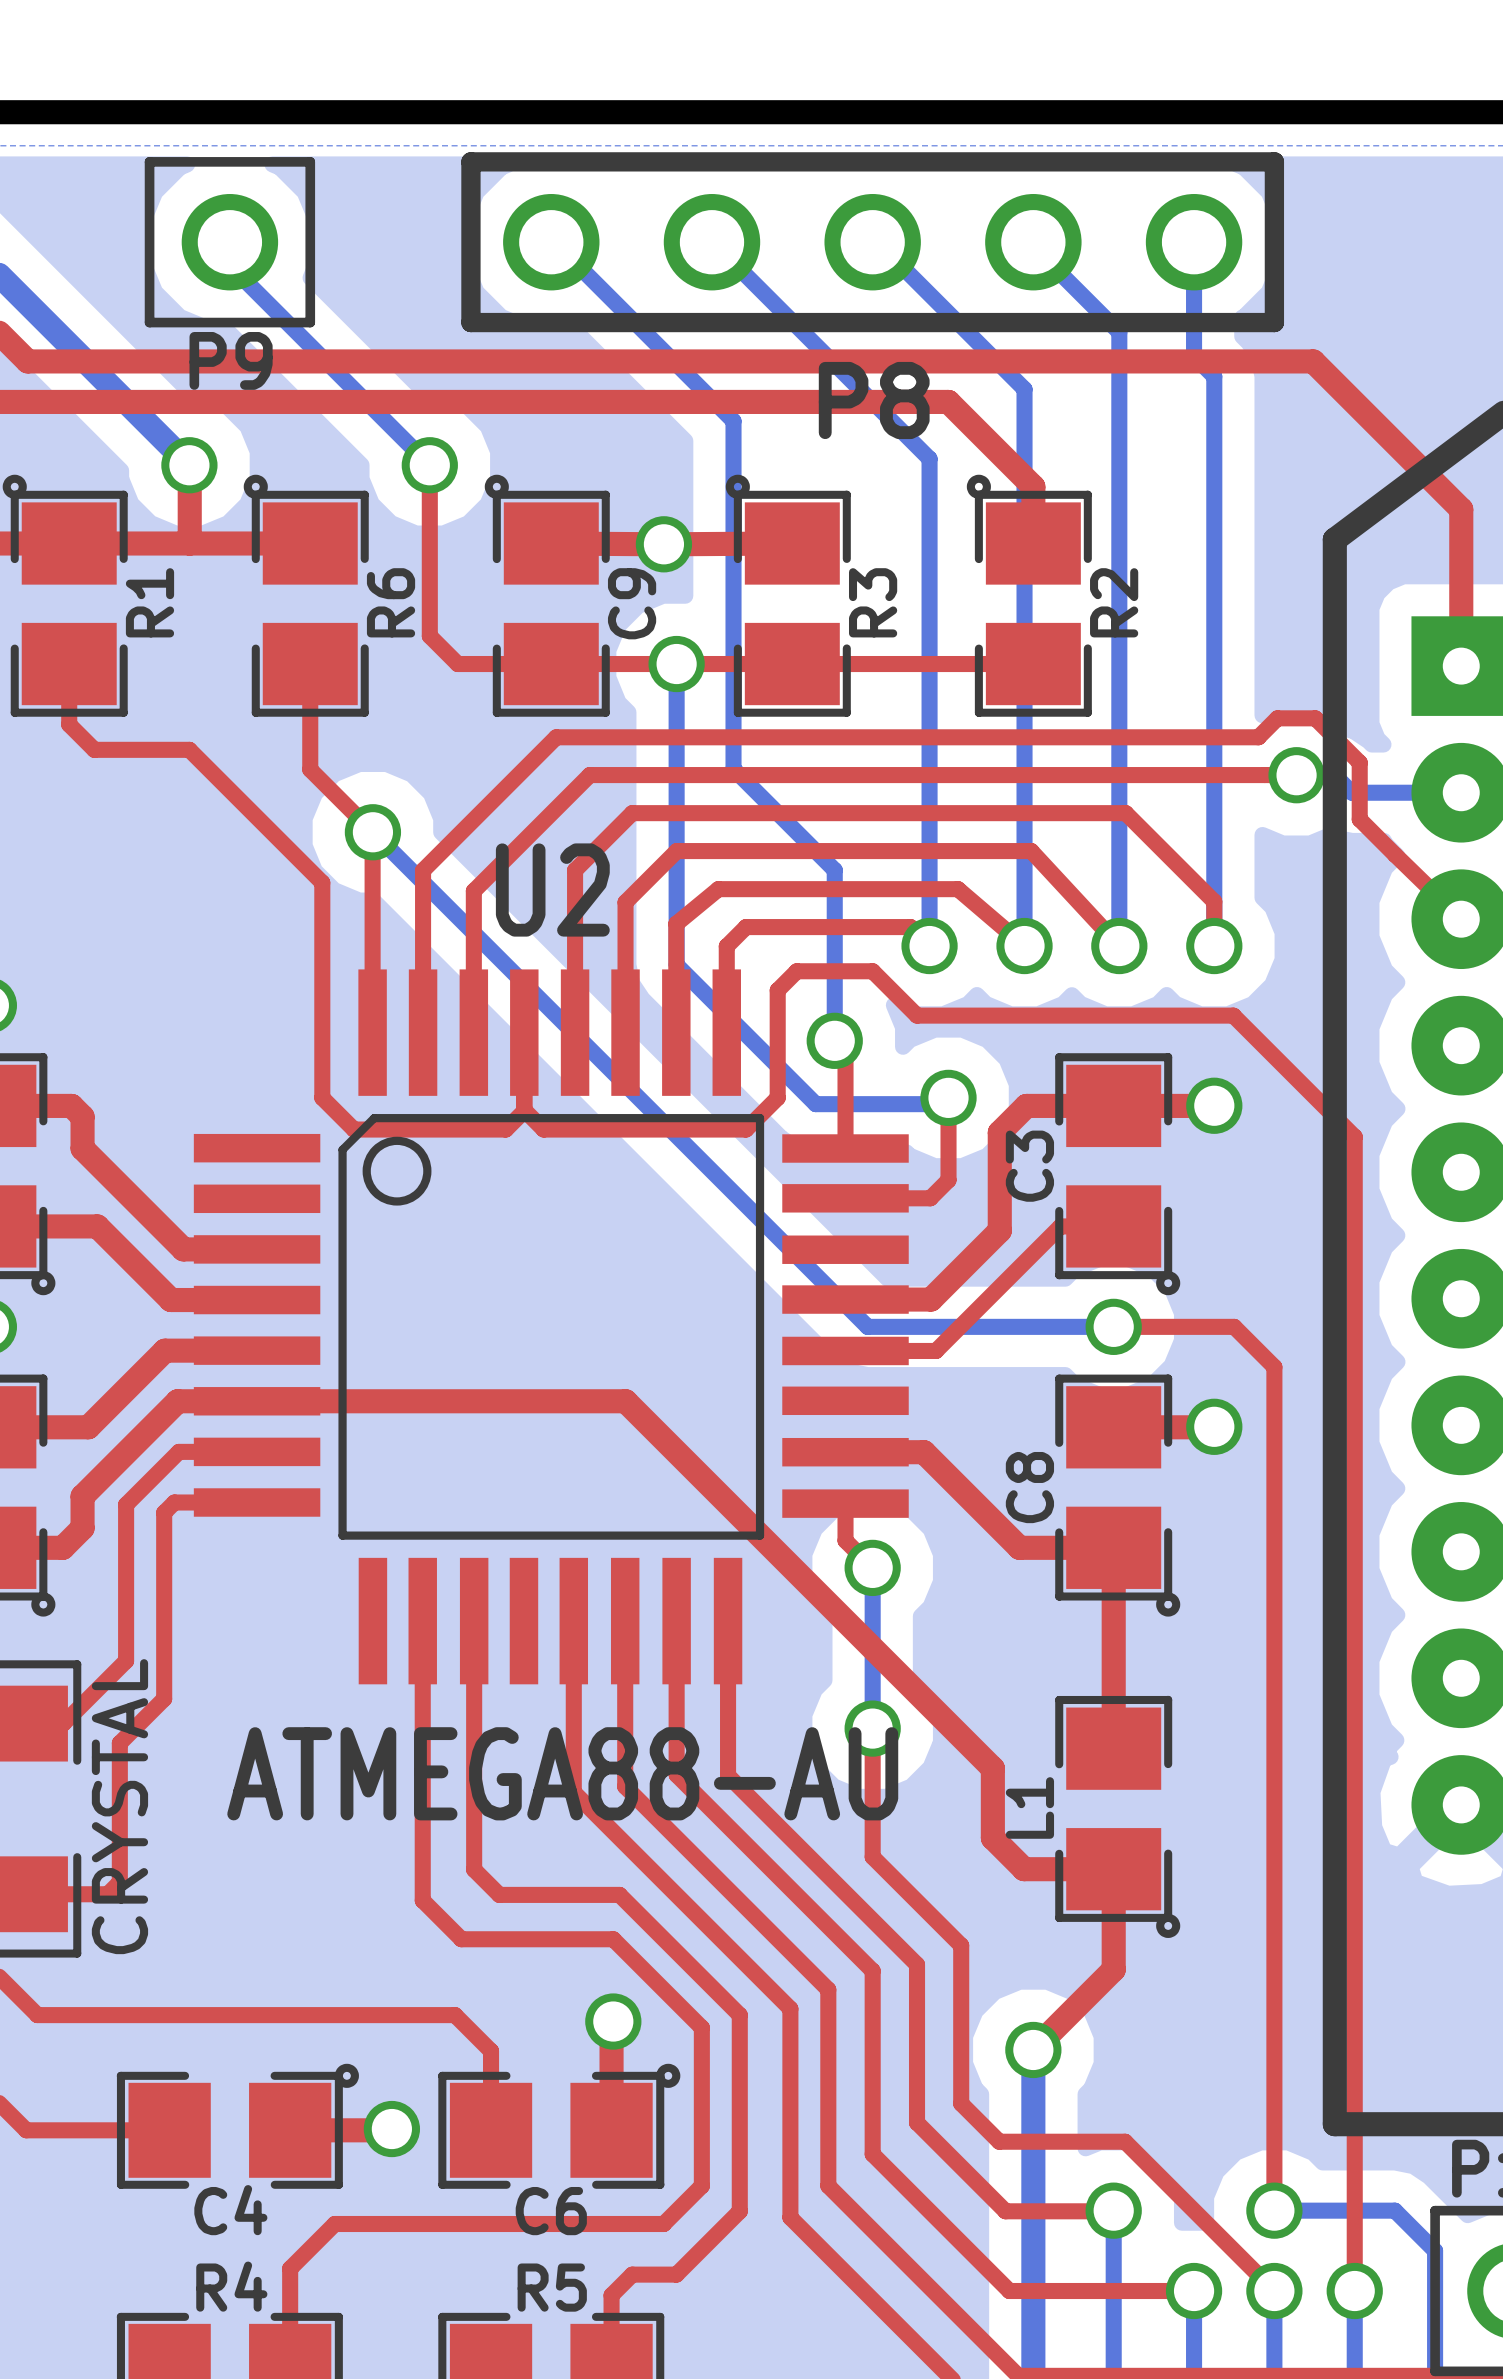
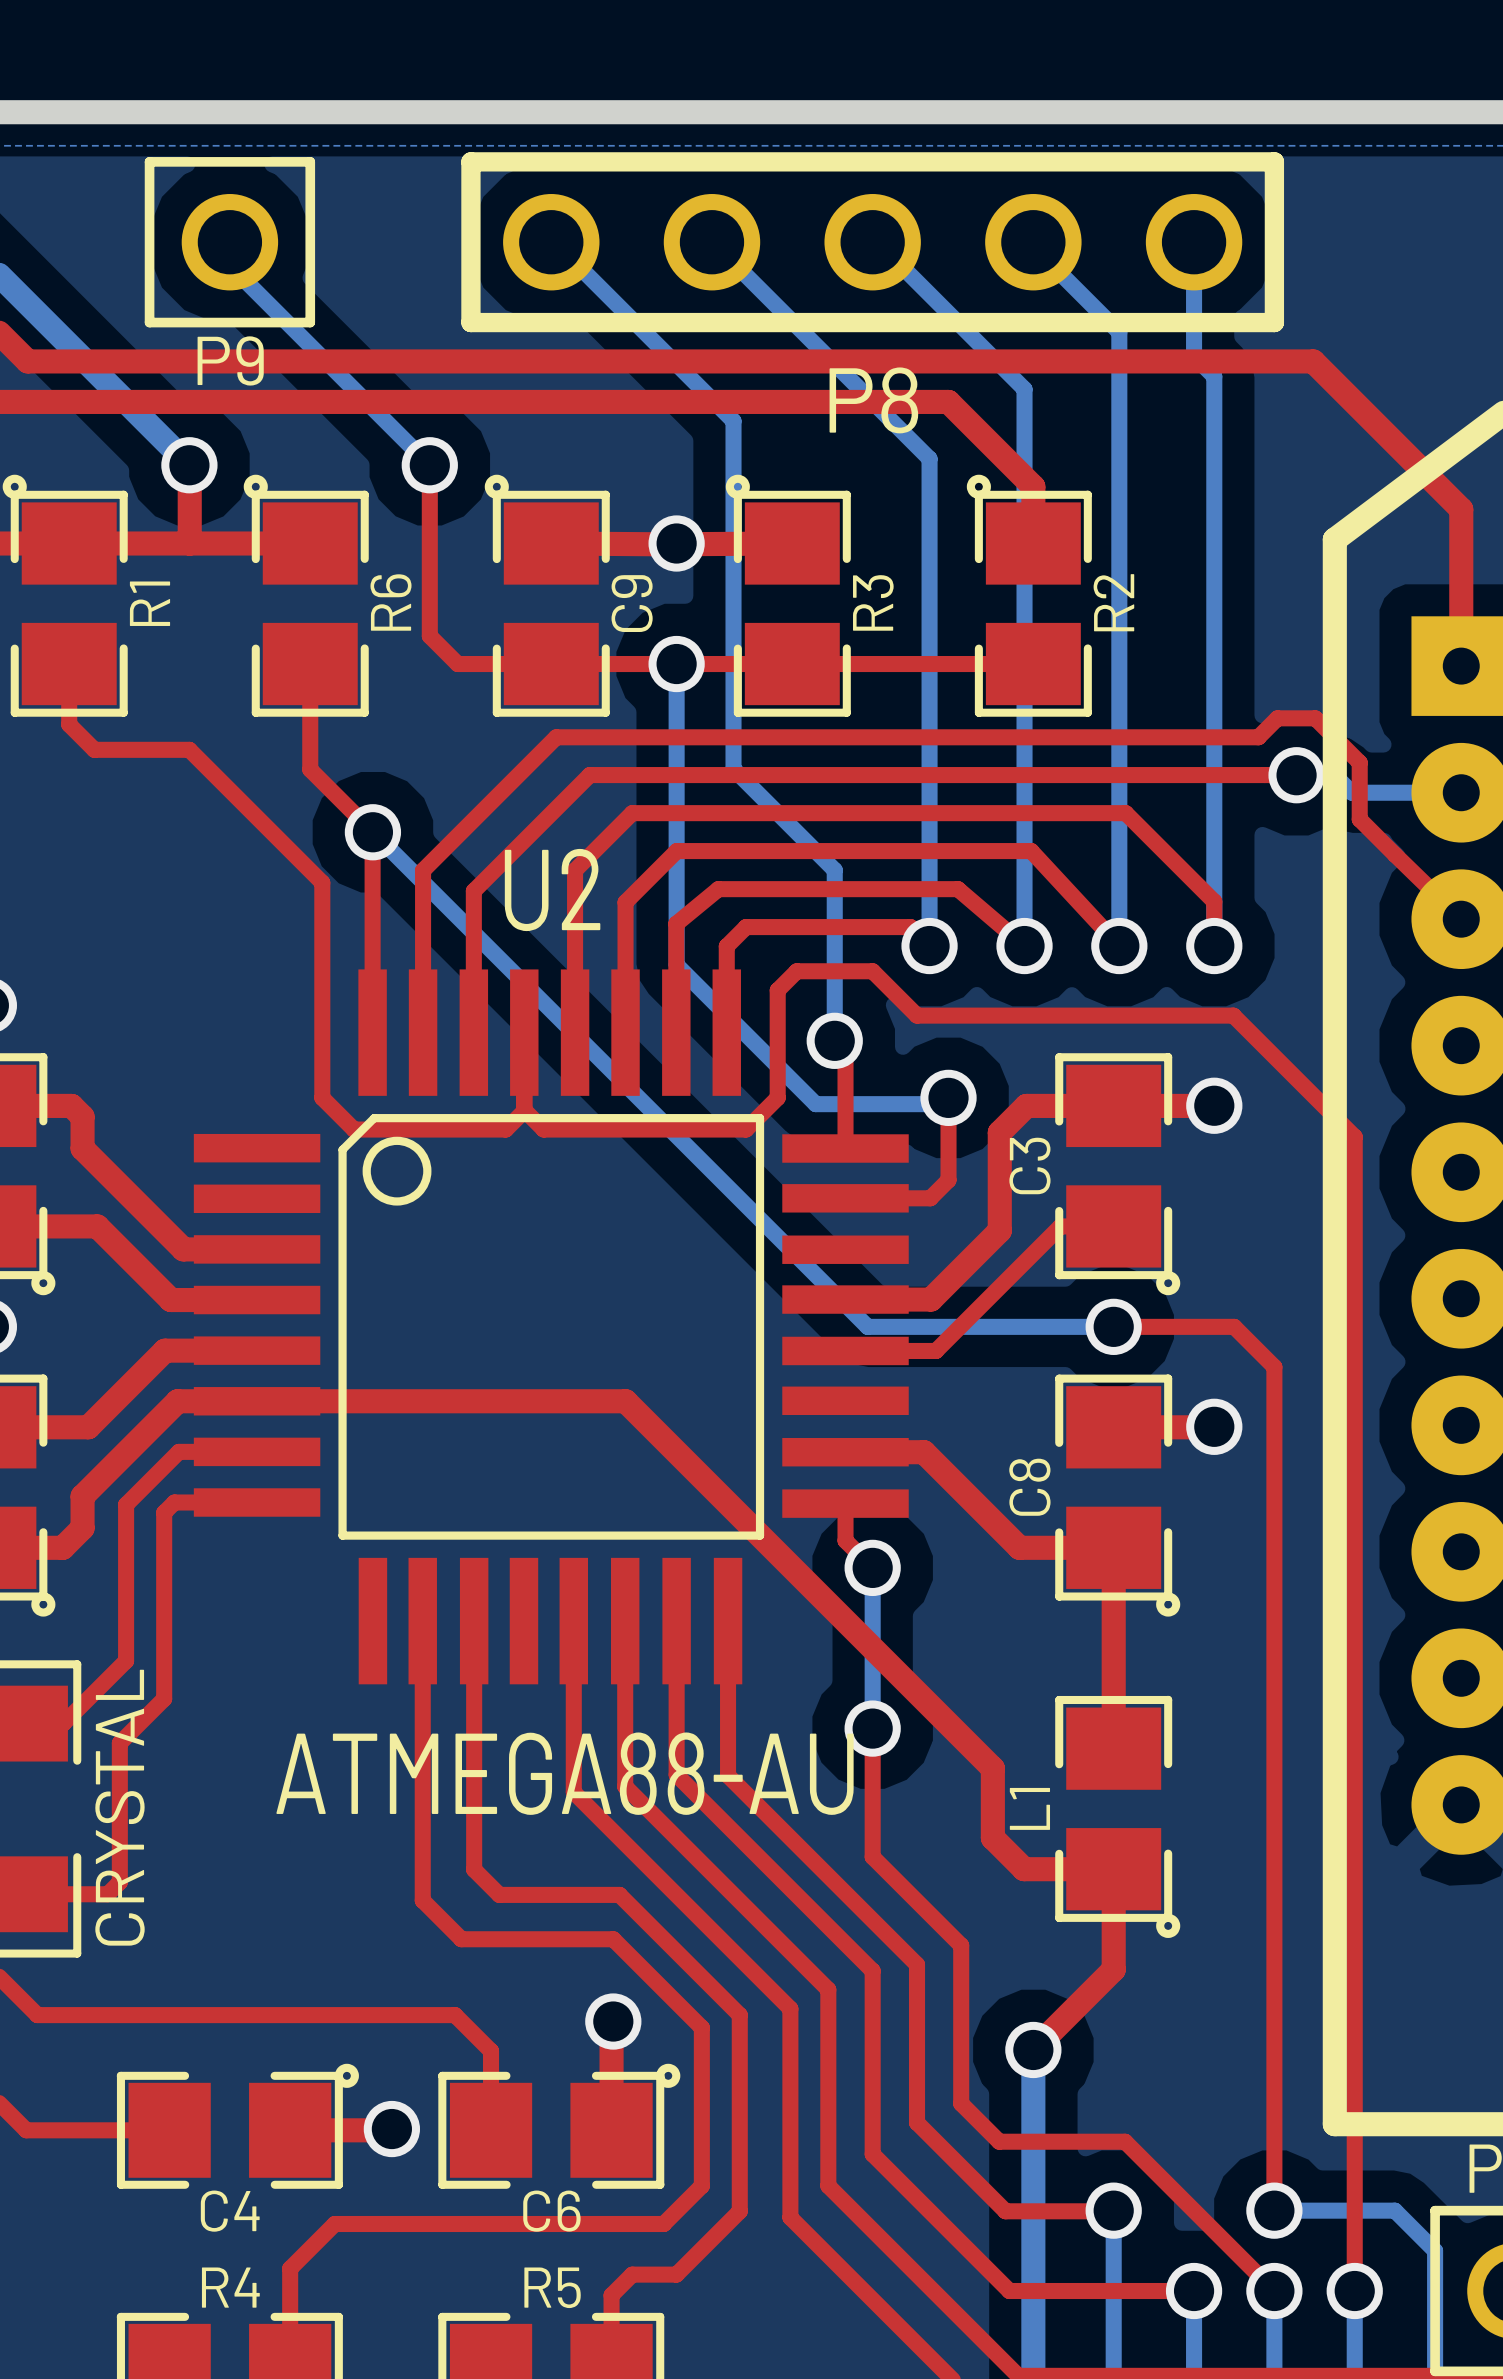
via position: (663, 544) -> (676, 543)

